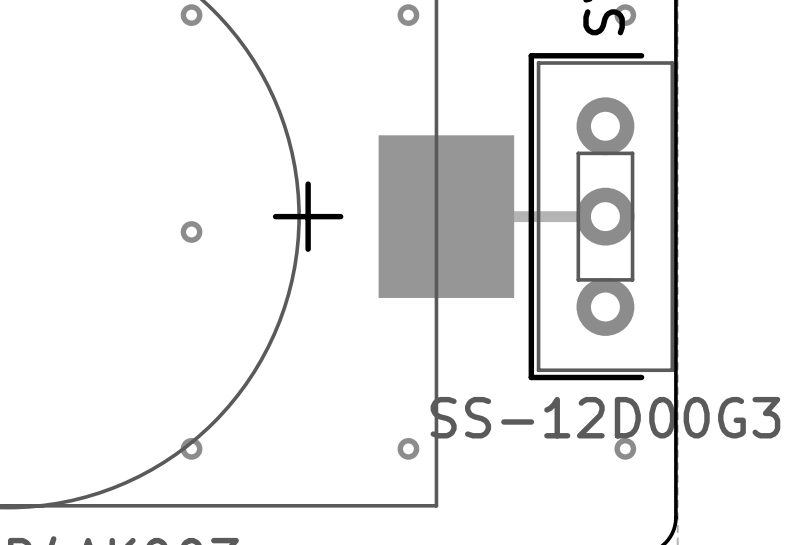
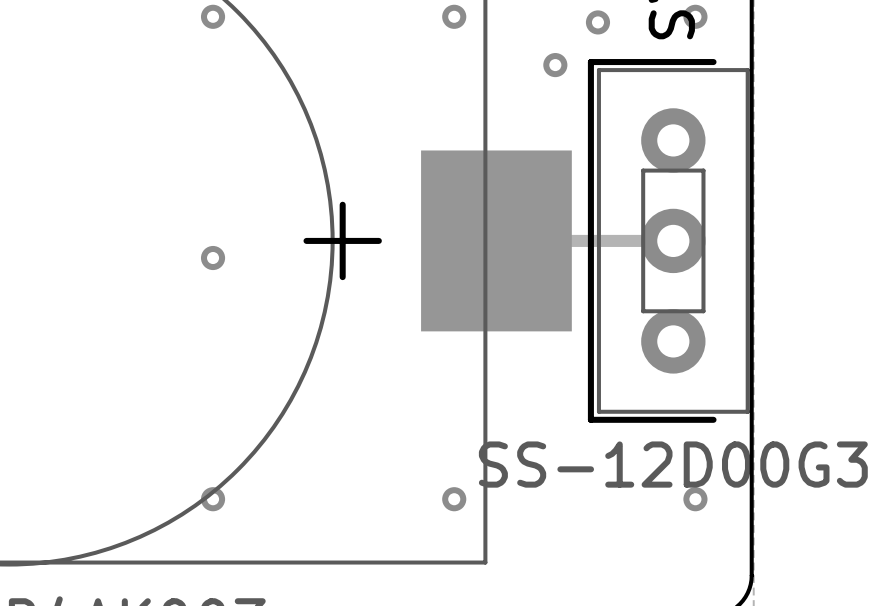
via: none -> (597, 22)
via: none -> (555, 65)

